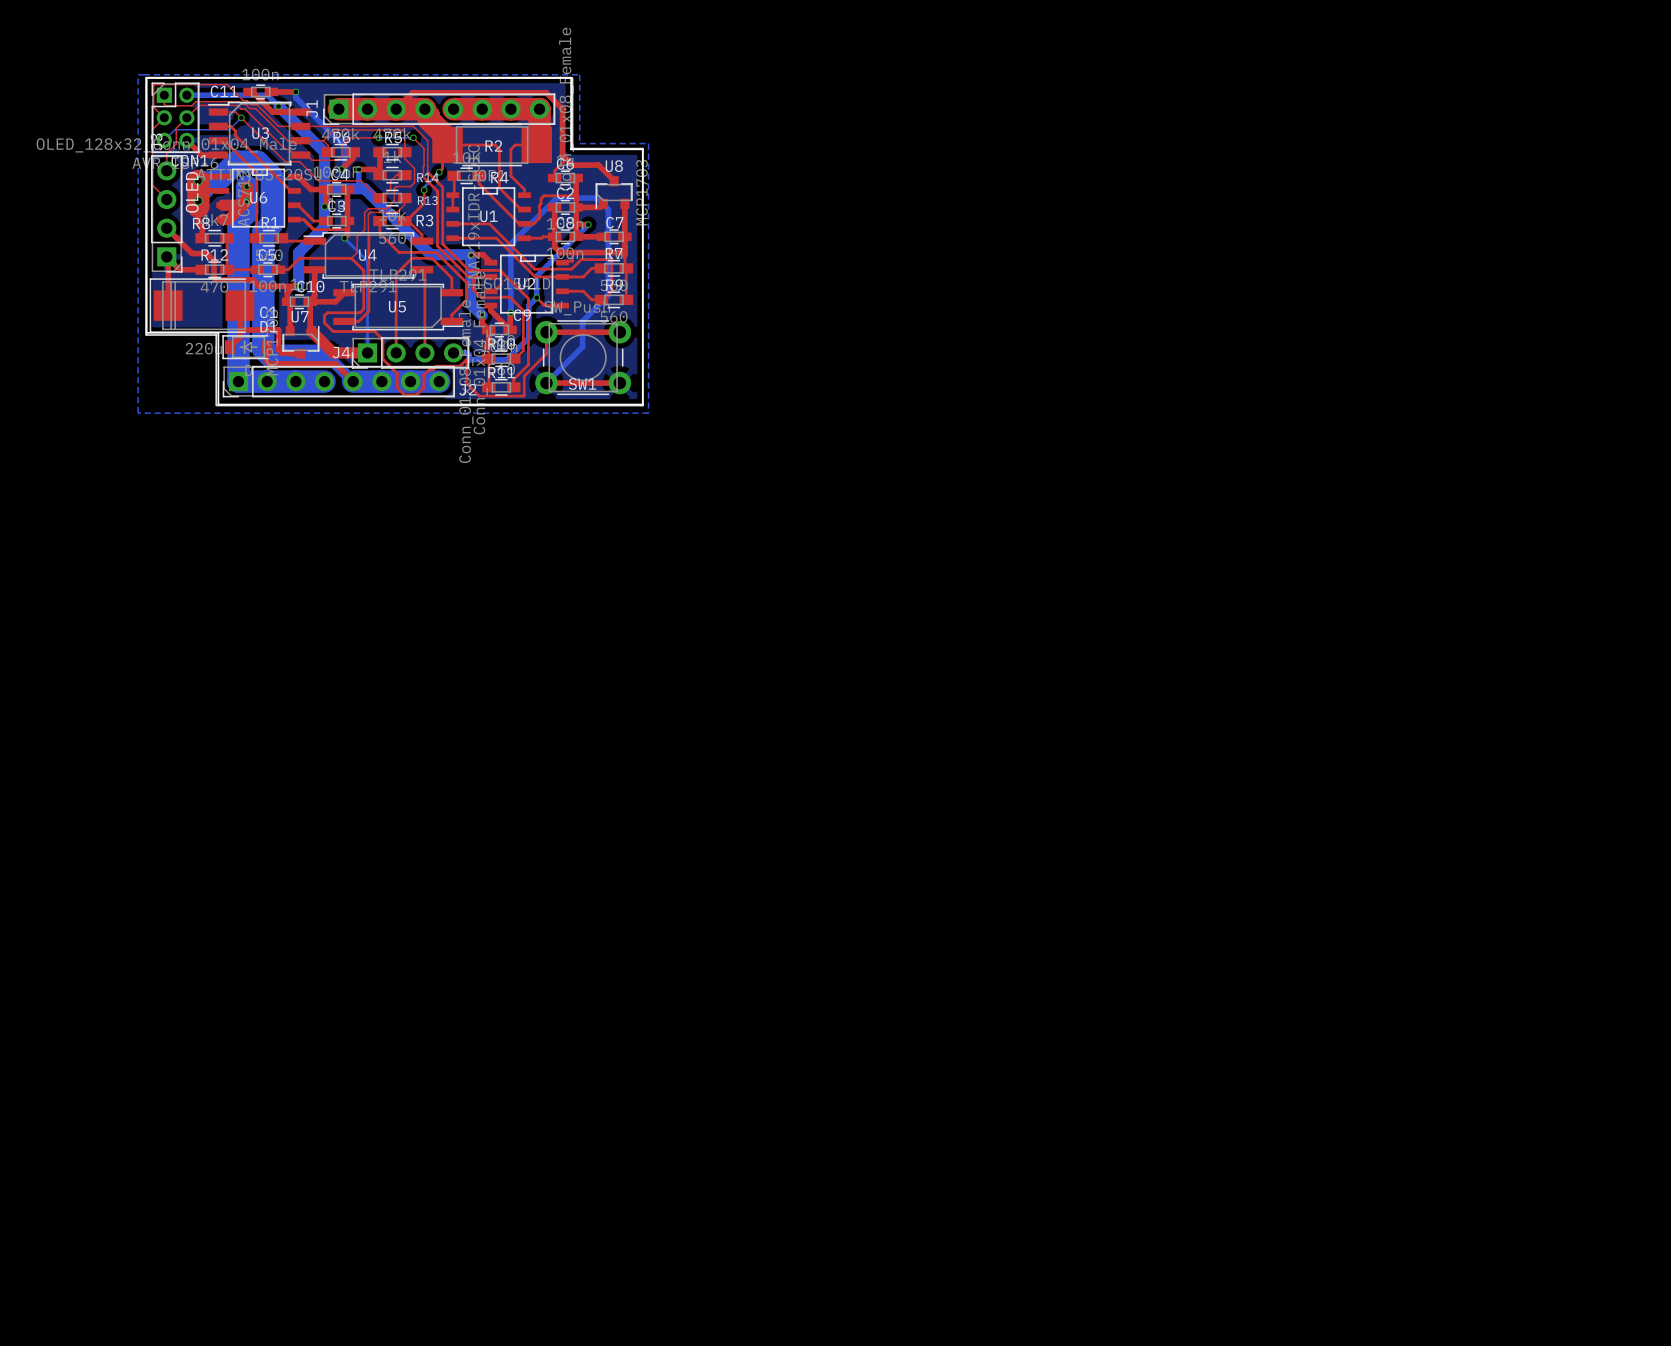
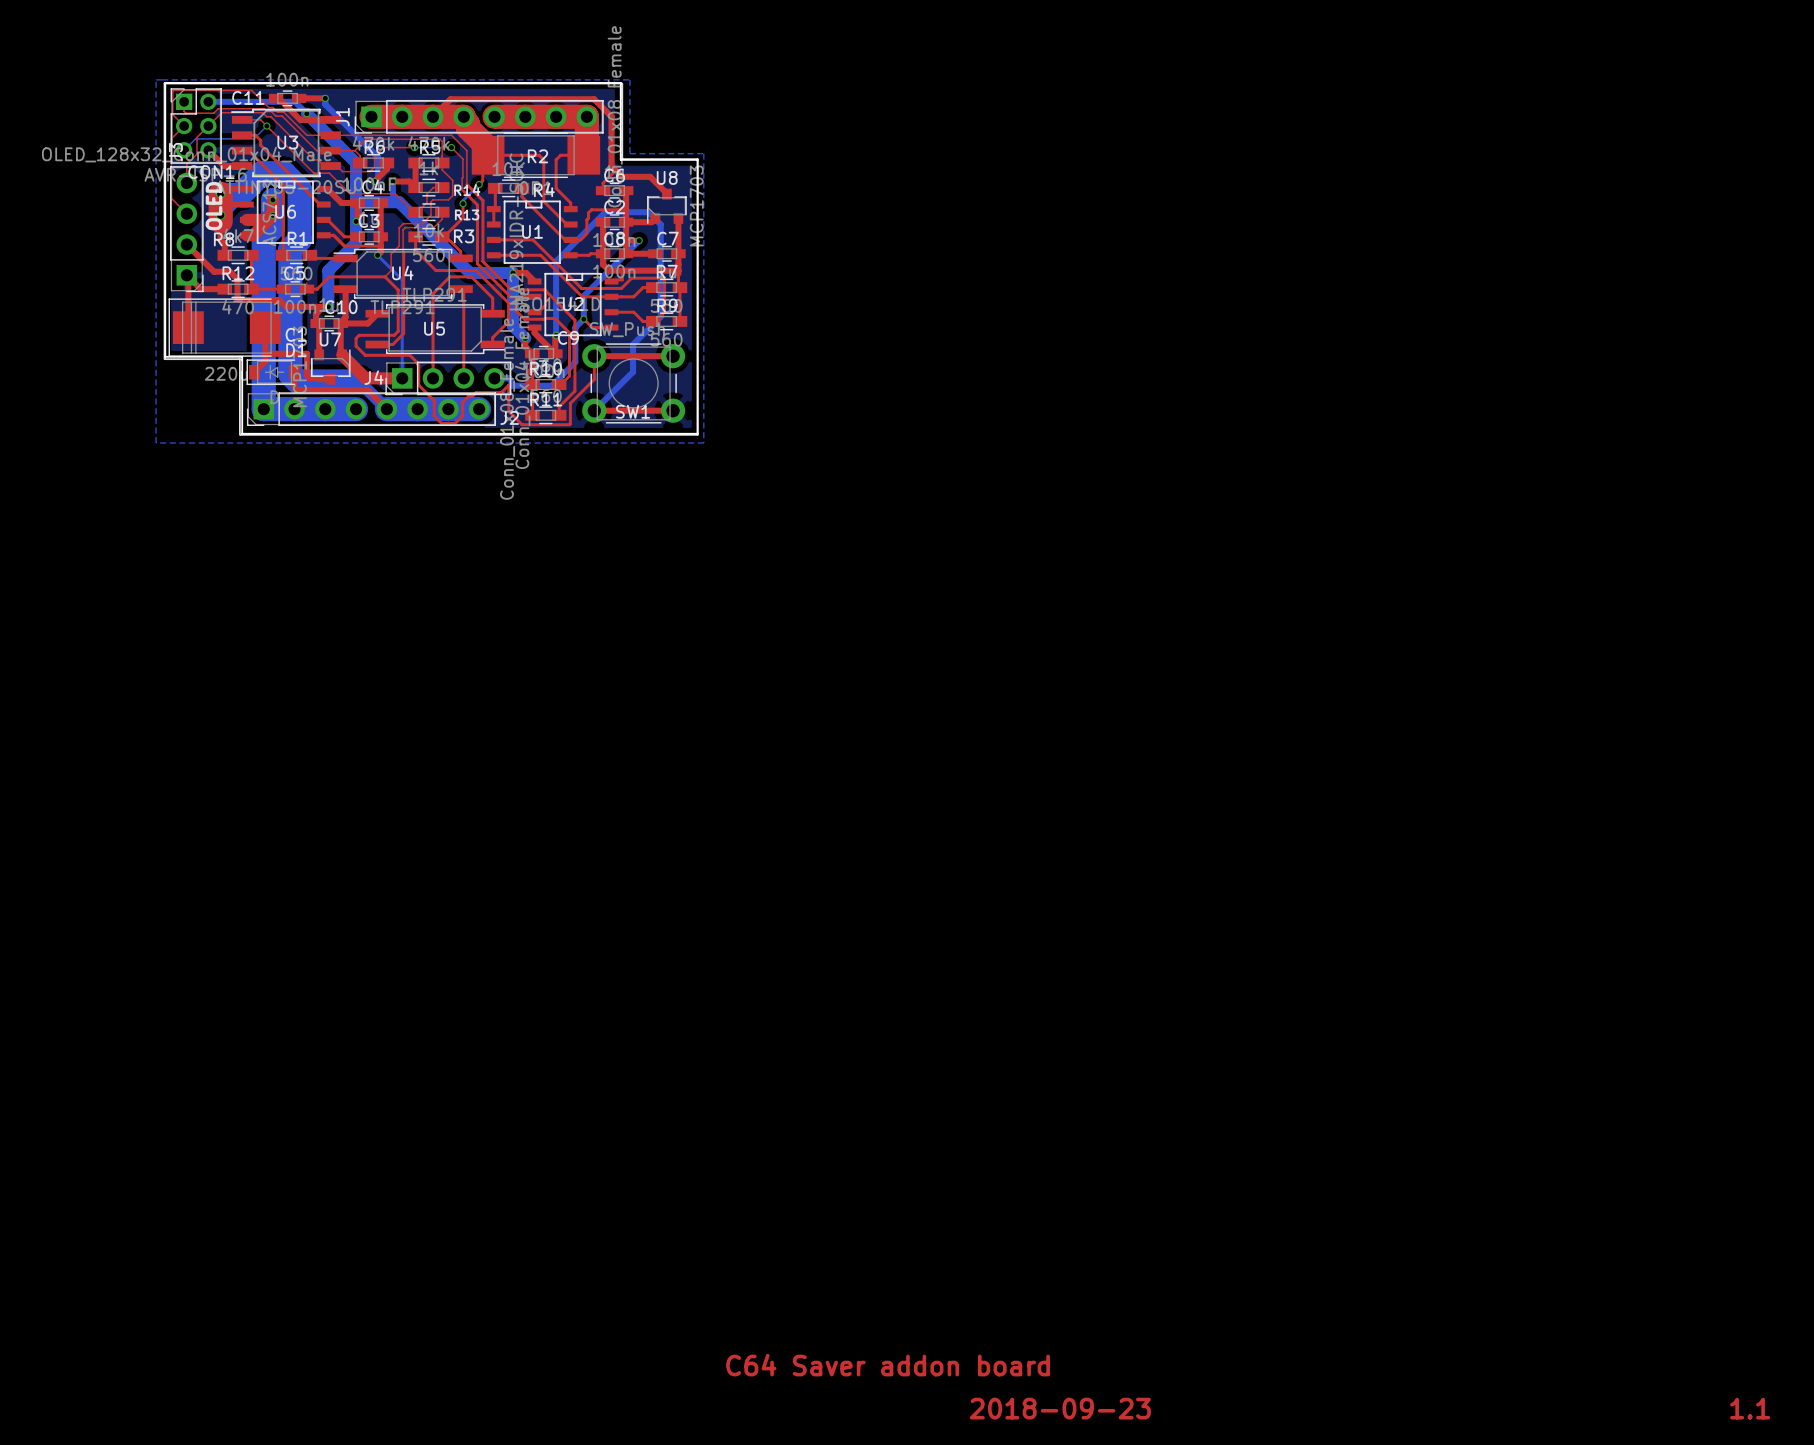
text: none -> C64 Saver addon board (888, 1365)
text: none -> 2018-09-23 (1060, 1408)
text: none -> 1.1 (1750, 1408)

